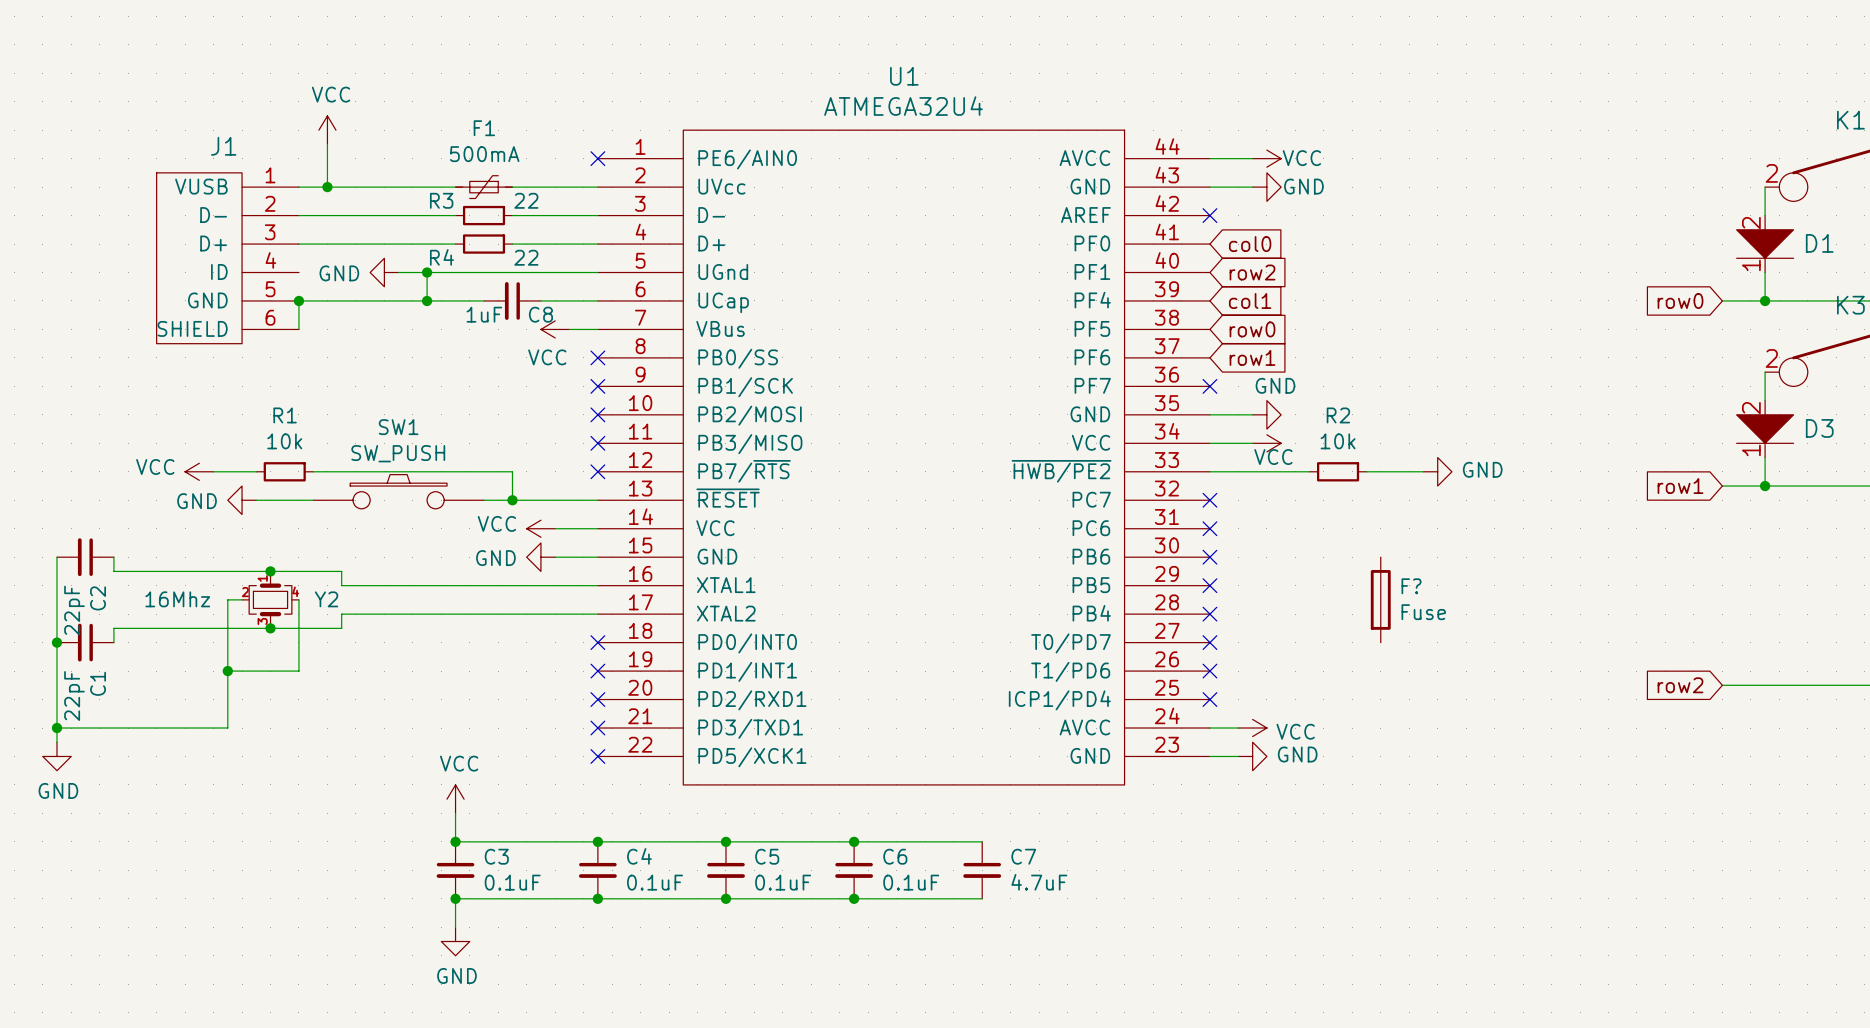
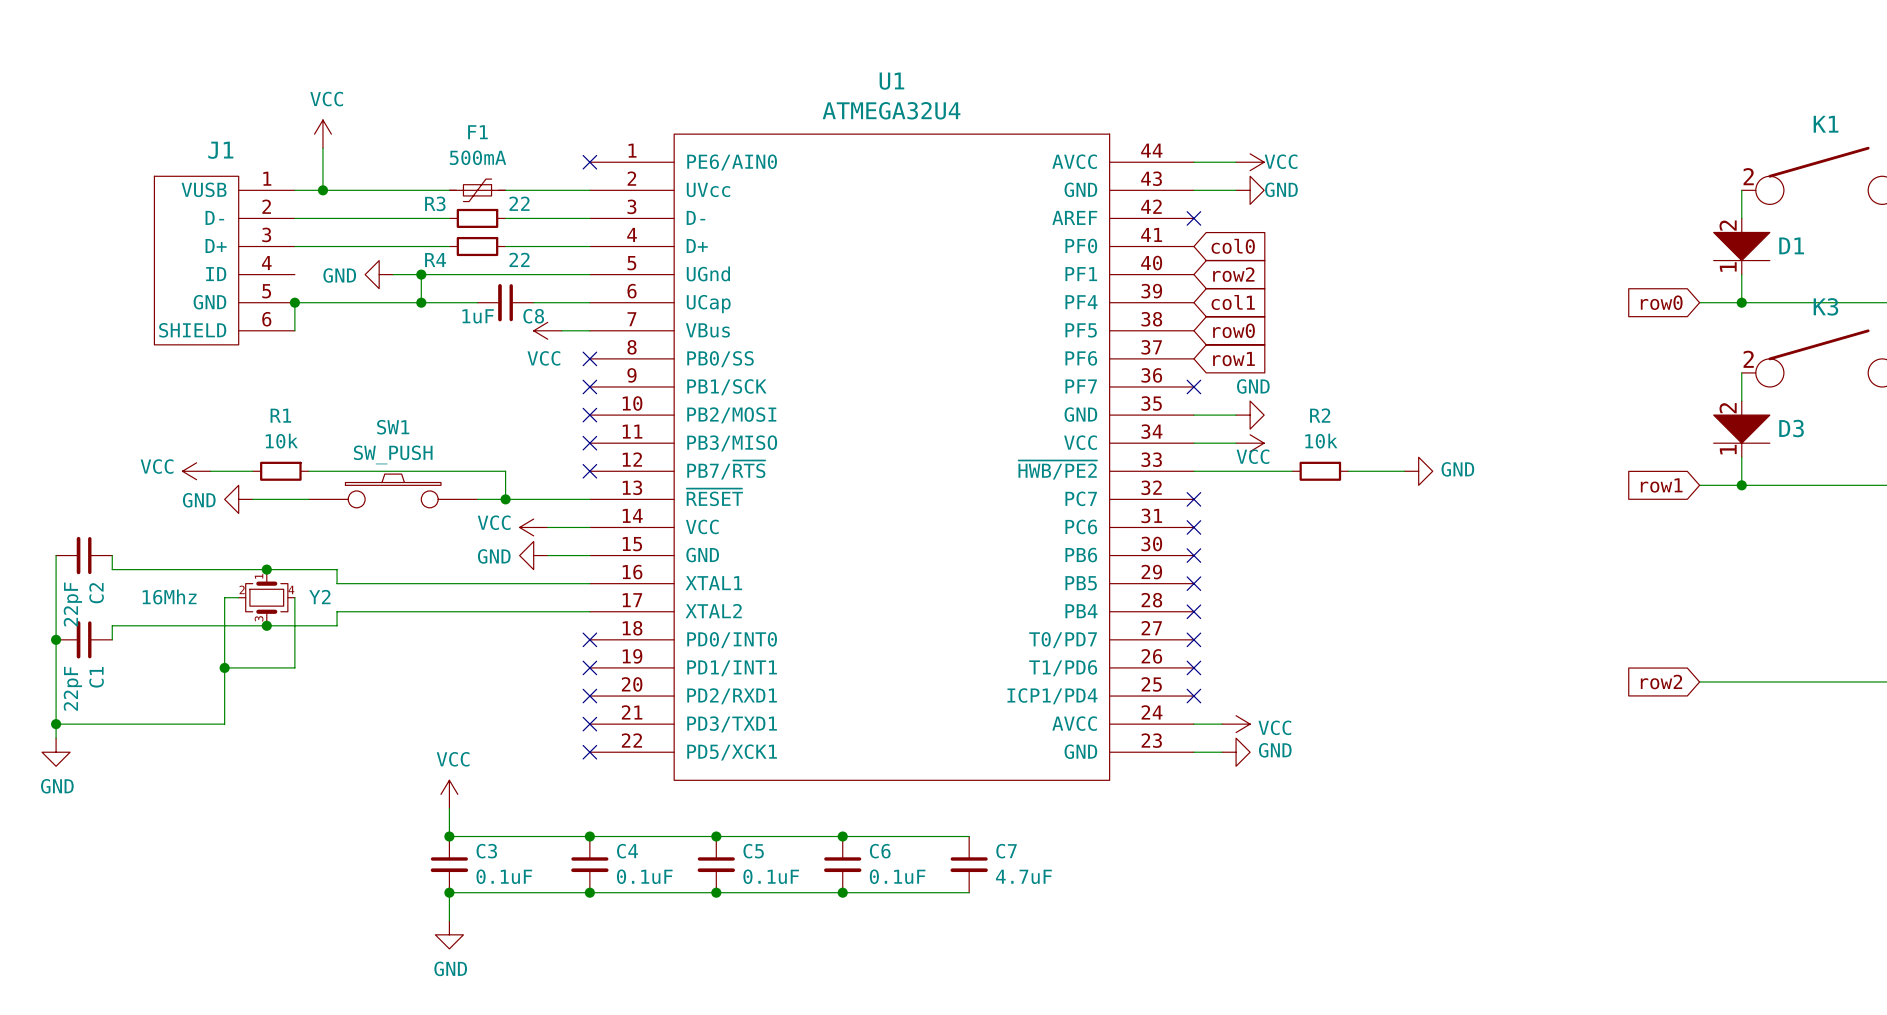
F?: Fuse (1380, 599) -> none

